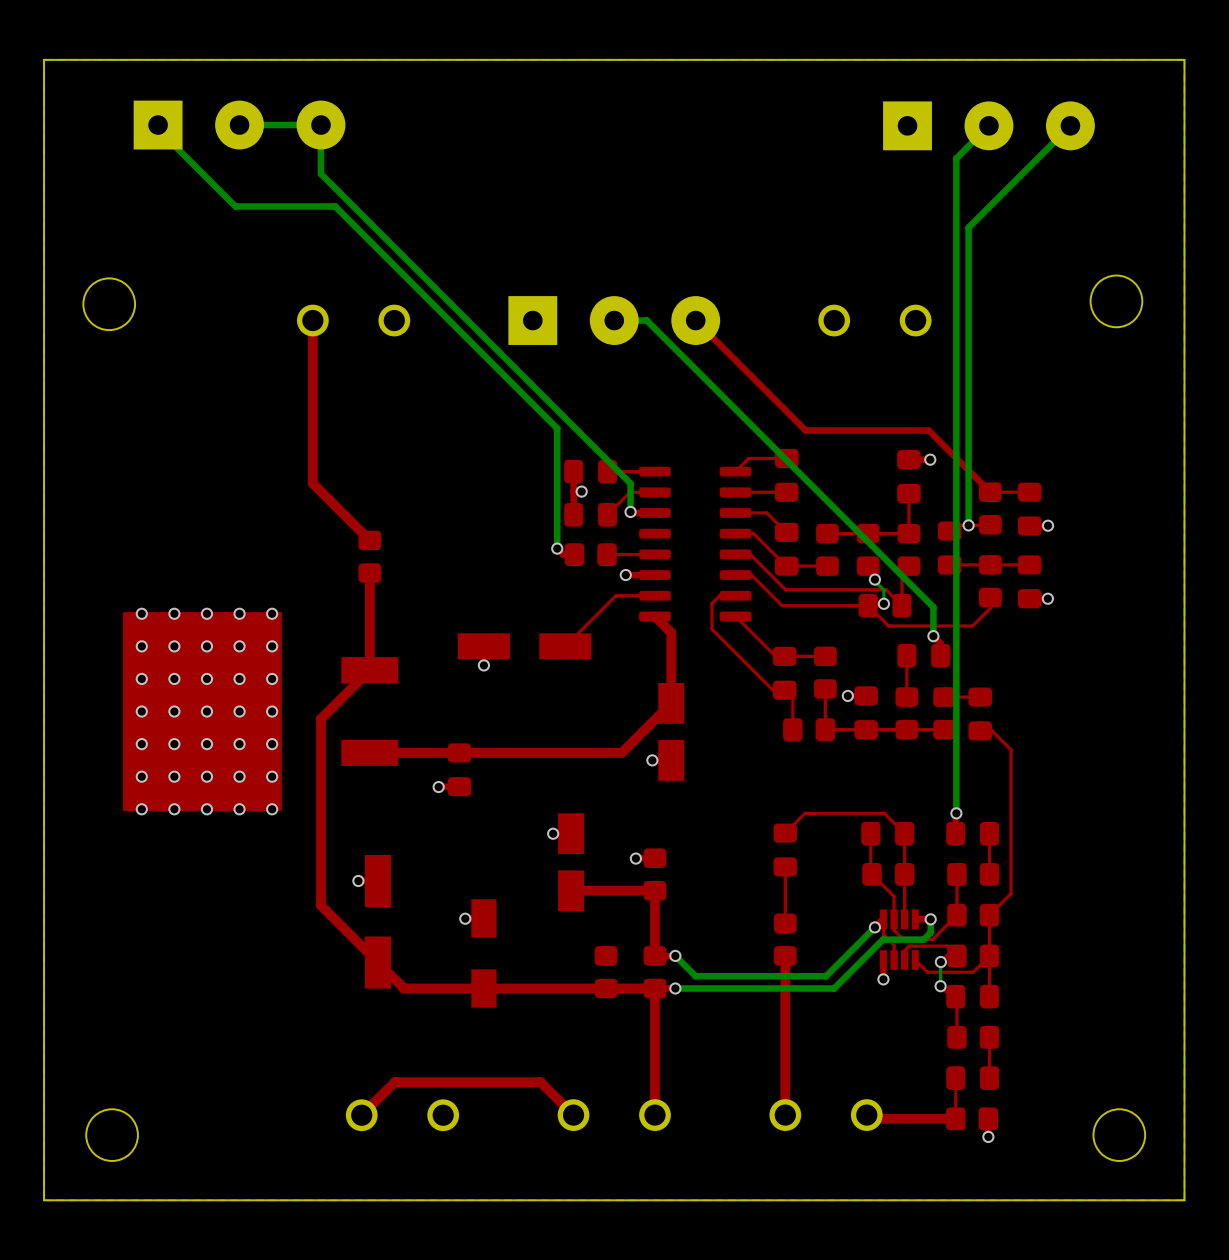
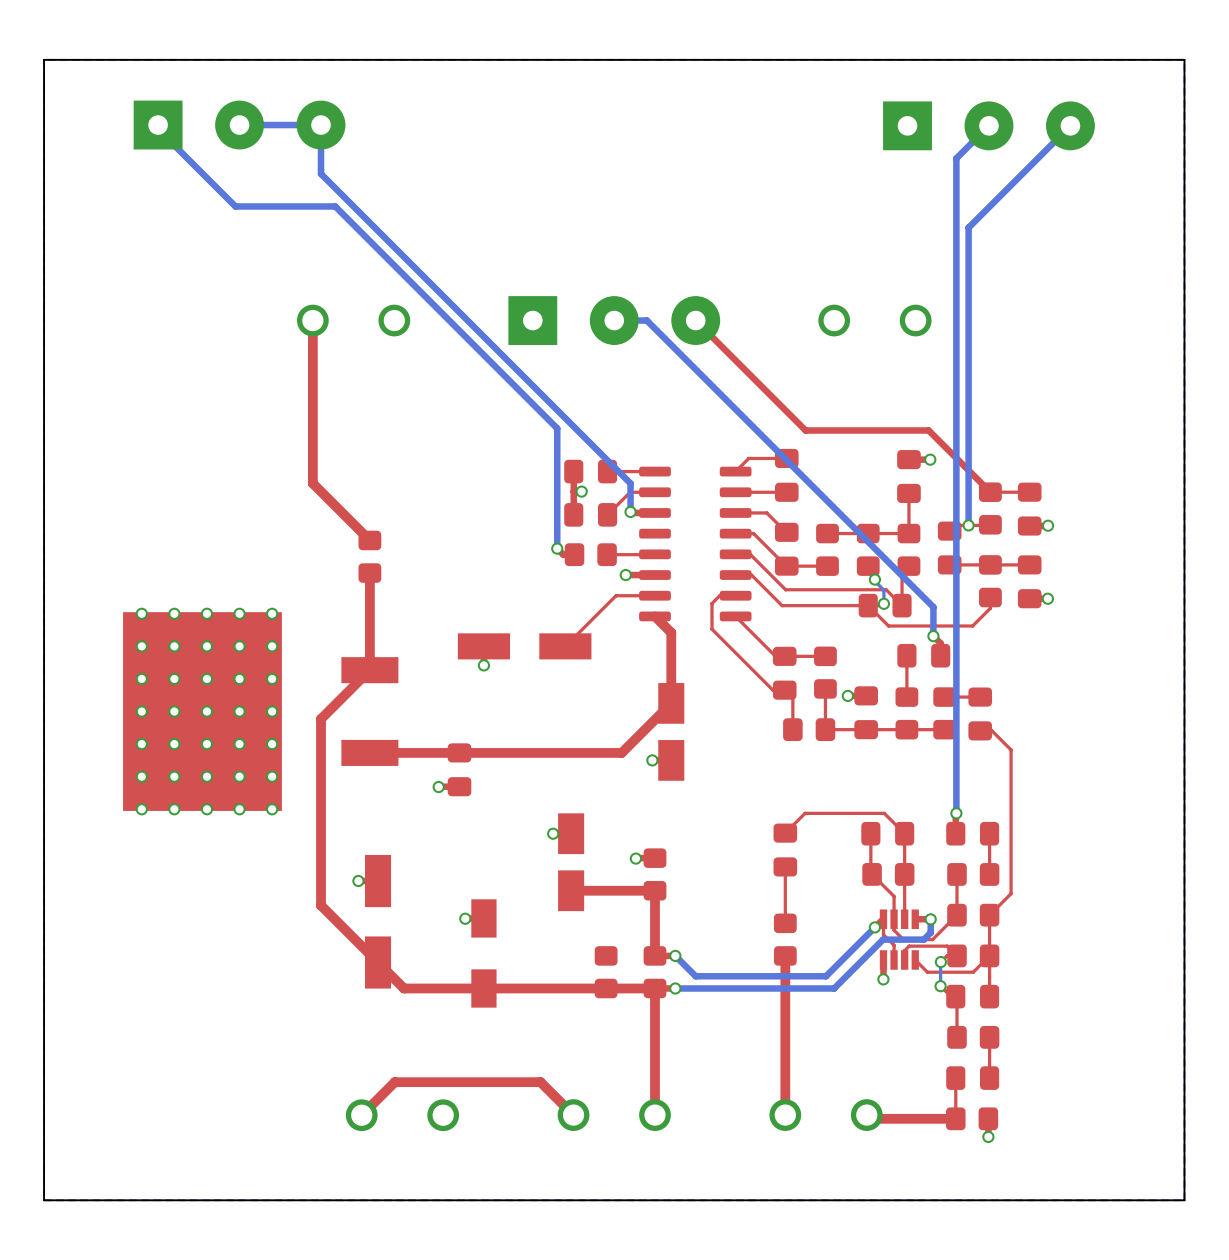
round board edge: [1089, 274, 1144, 329] -> none
round board edge: [82, 277, 136, 331] -> none
round board edge: [85, 1108, 139, 1162] -> none
round board edge: [1092, 1108, 1146, 1162] -> none

